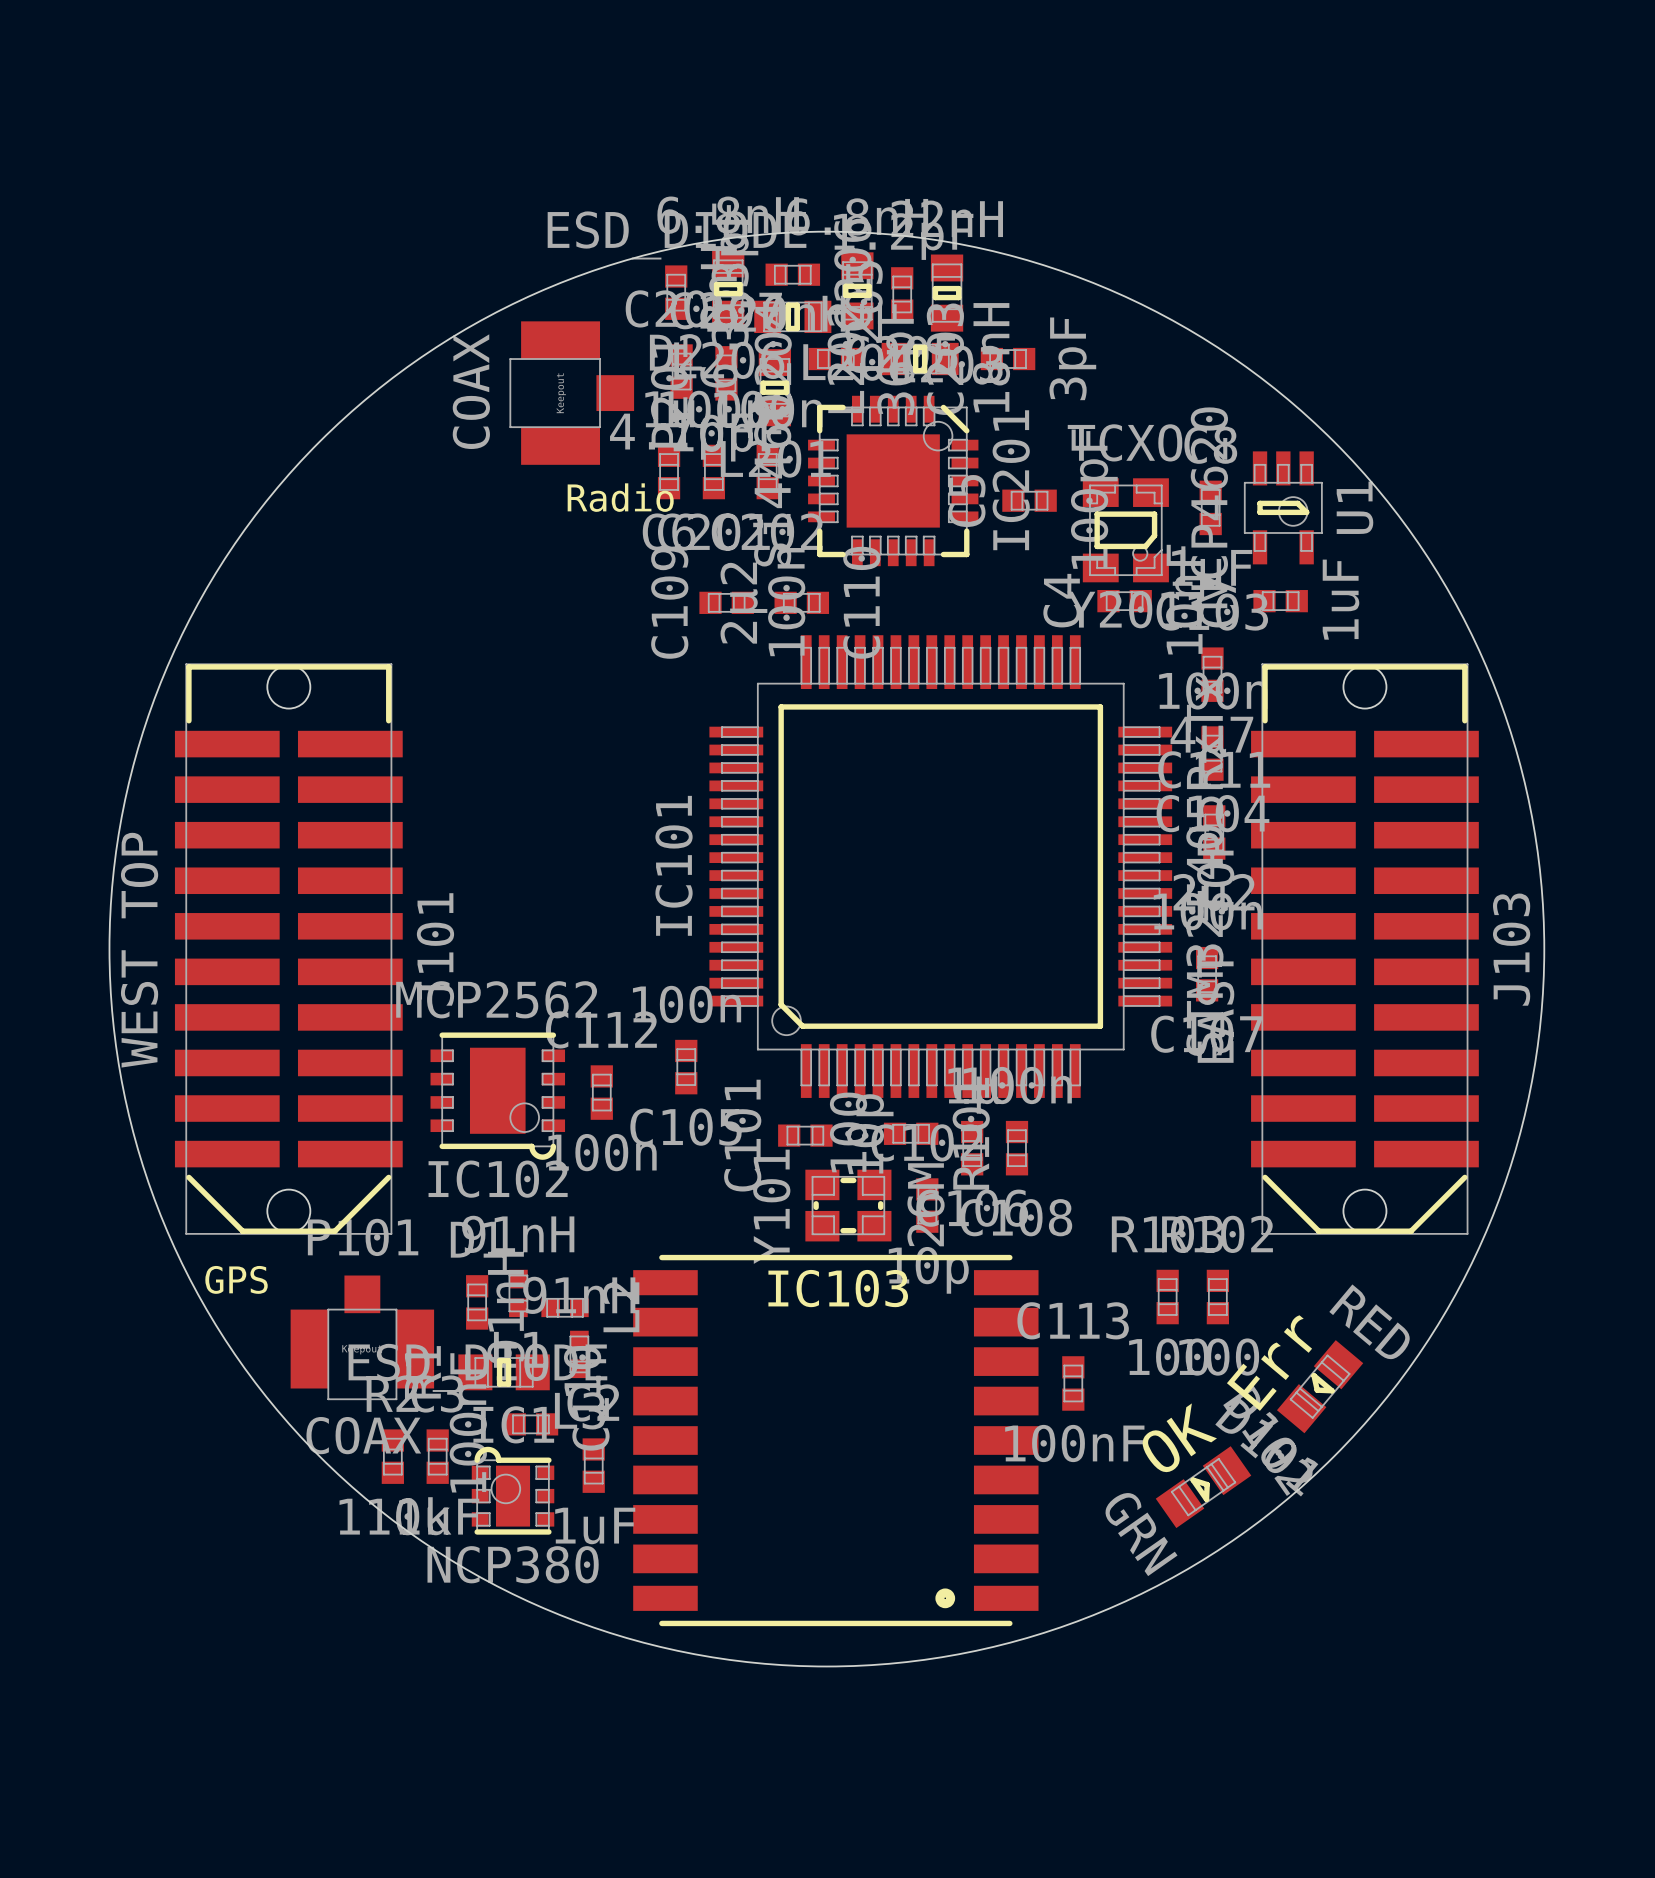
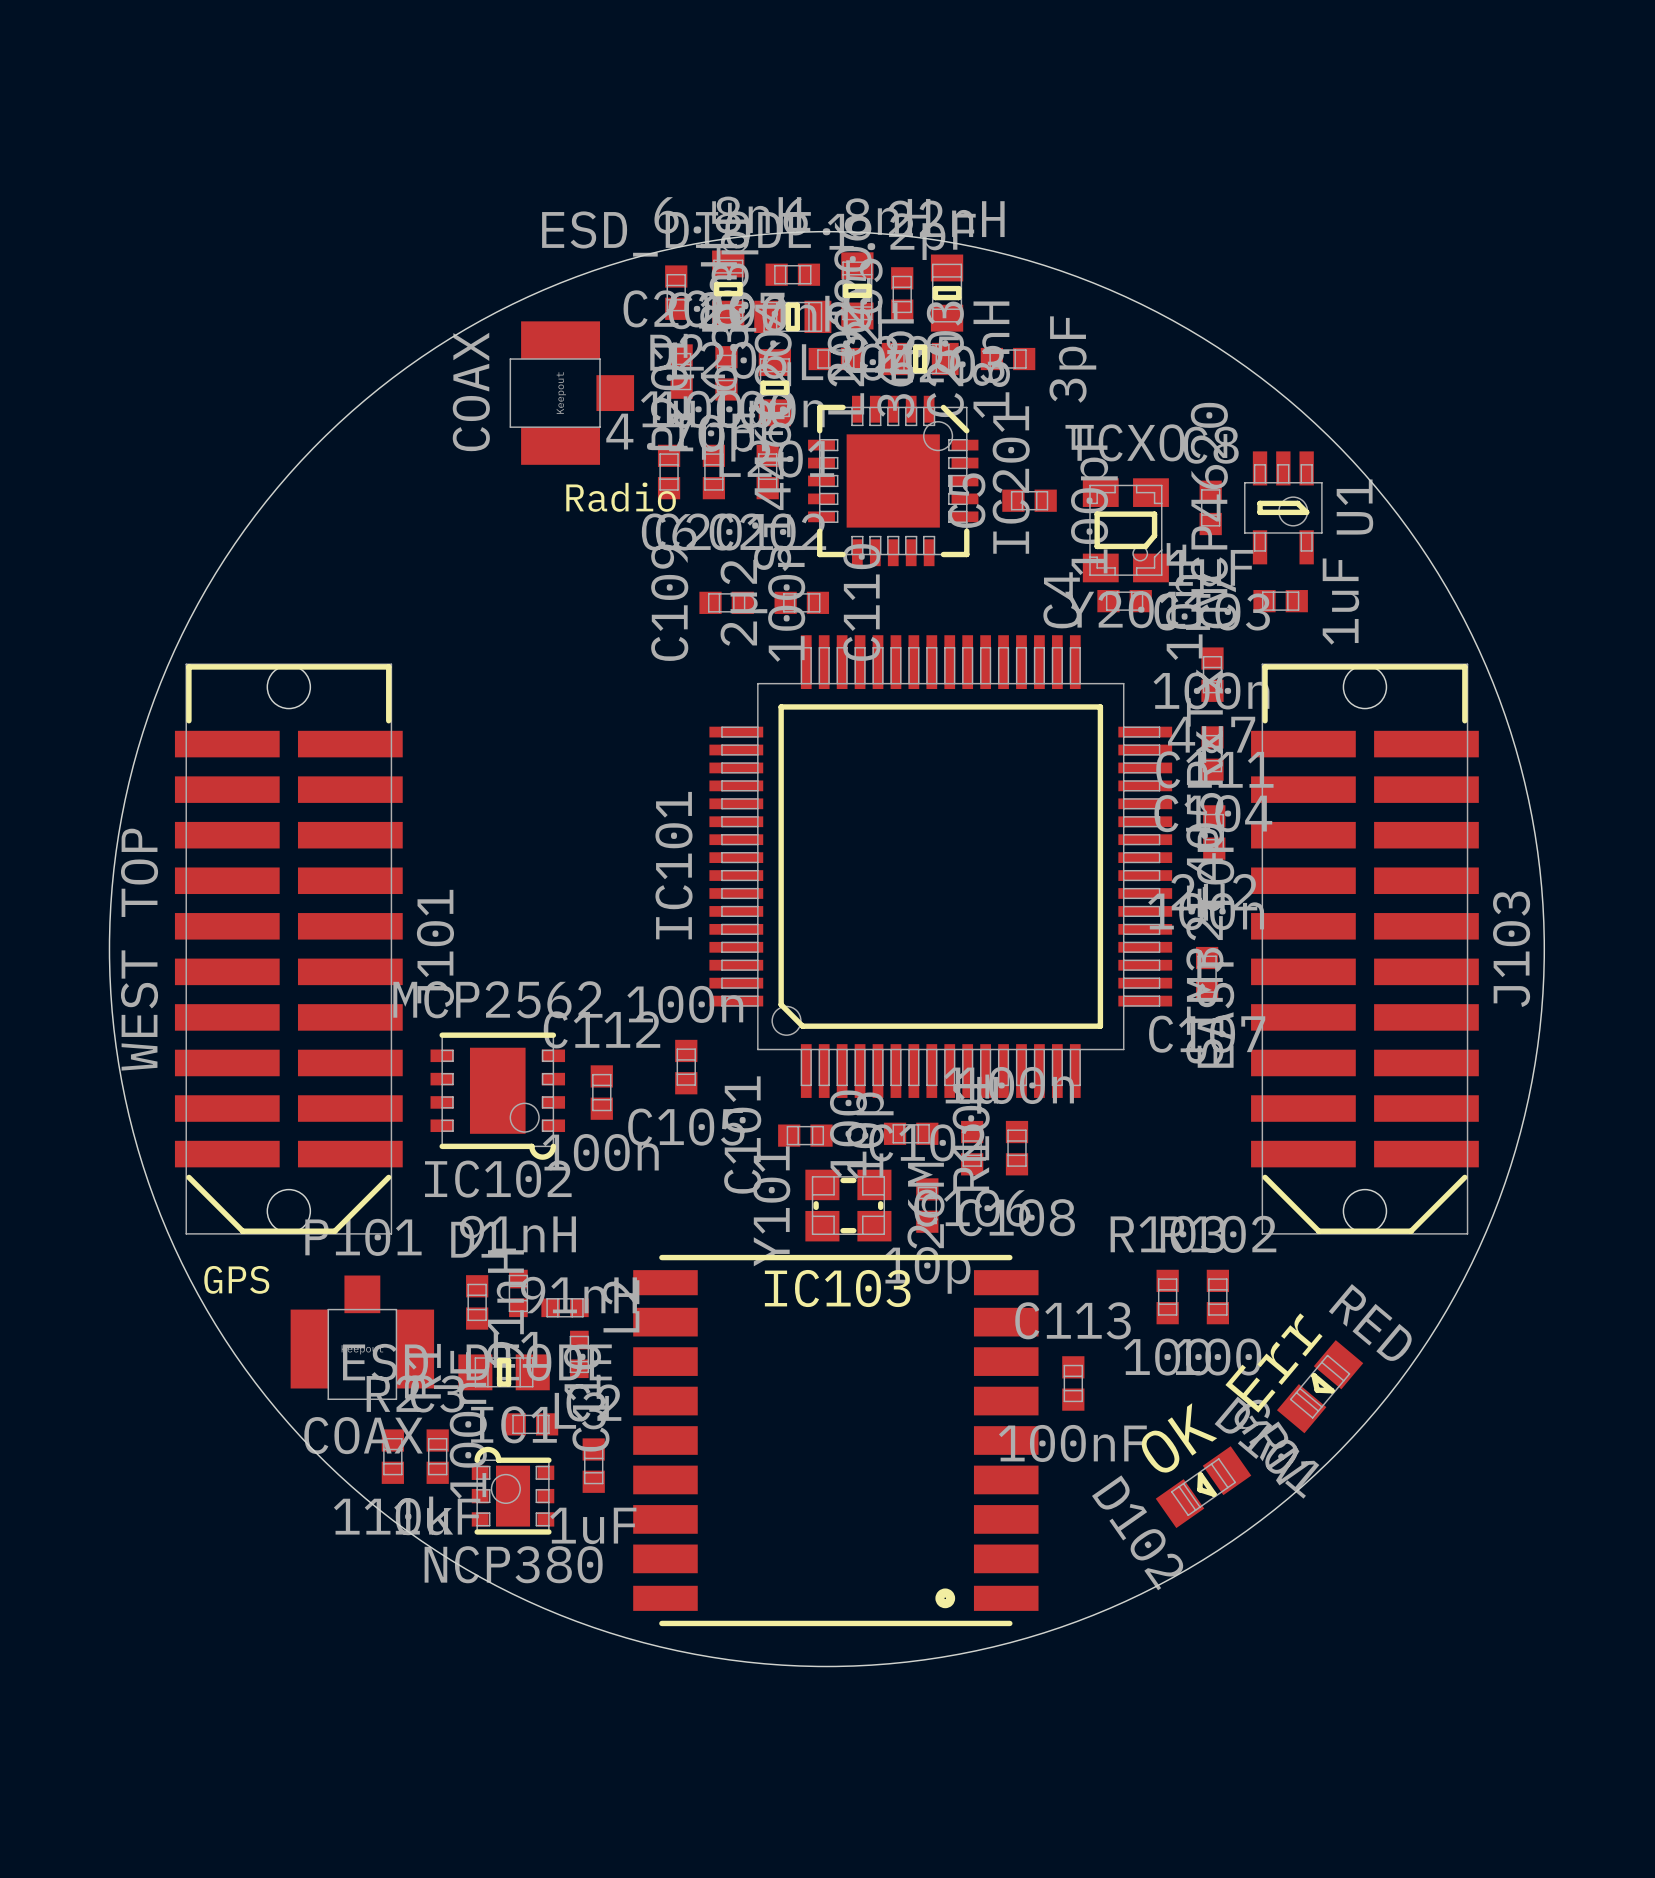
D102 rotation: 0° (1203, 1487) -> 180° (1203, 1487)

